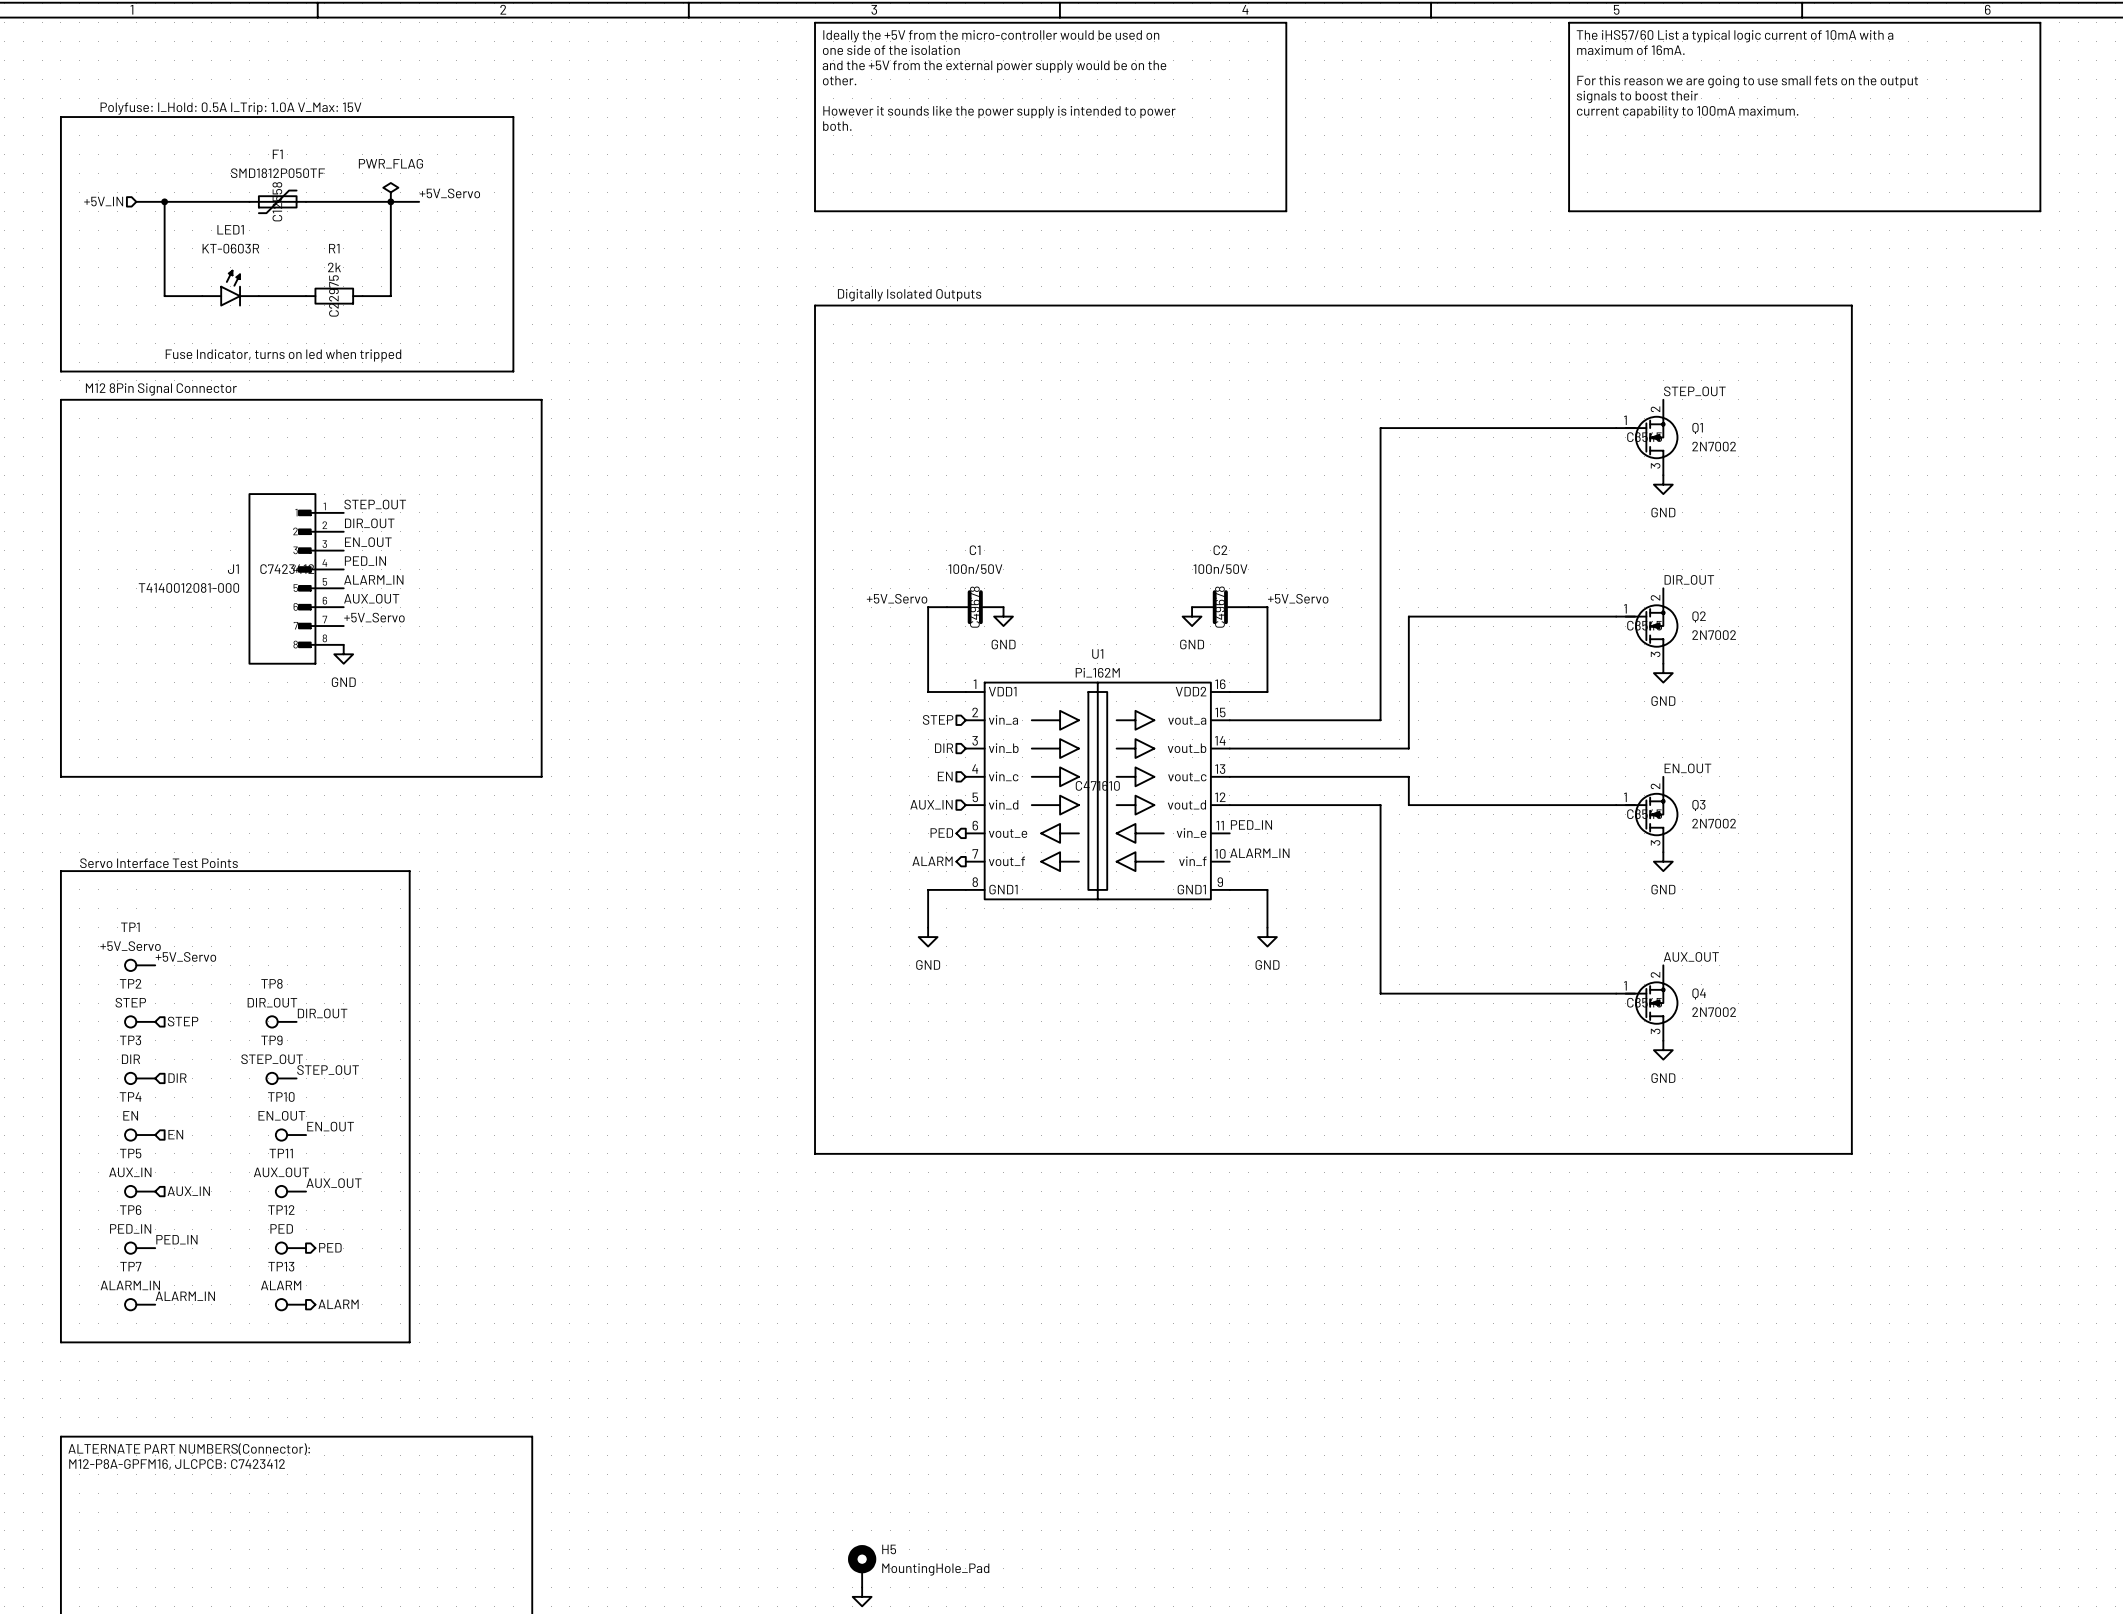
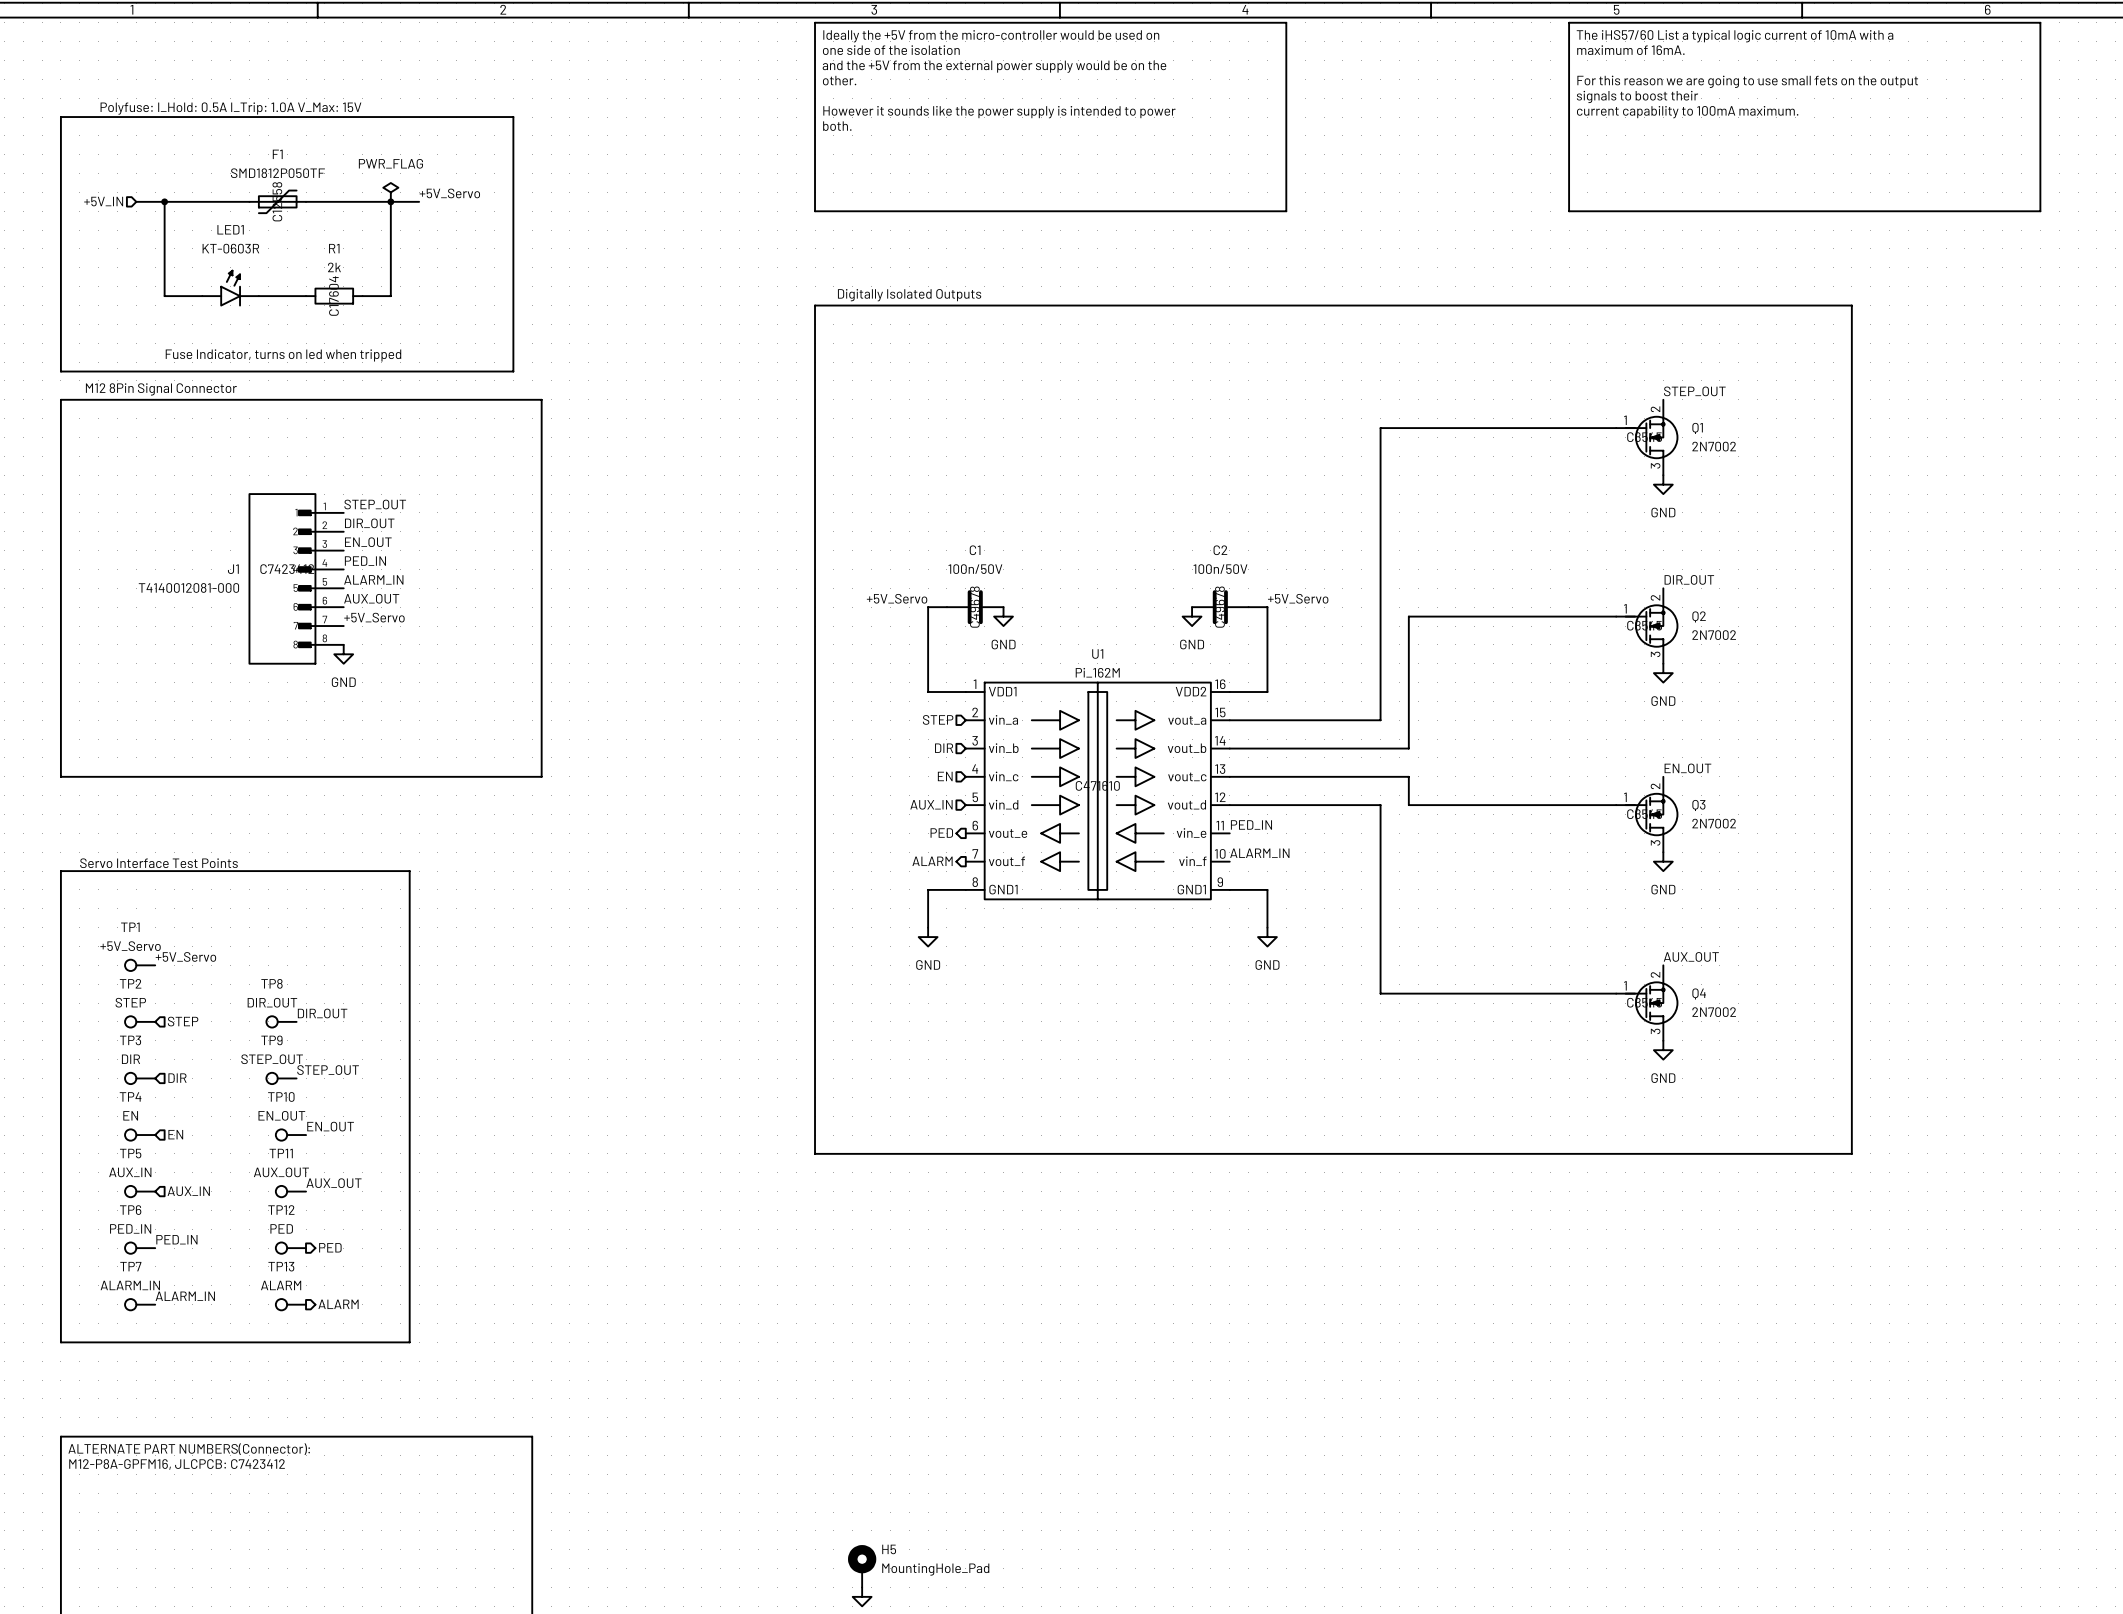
R1 text: C22975 (333, 295) -> C17604 (333, 296)

